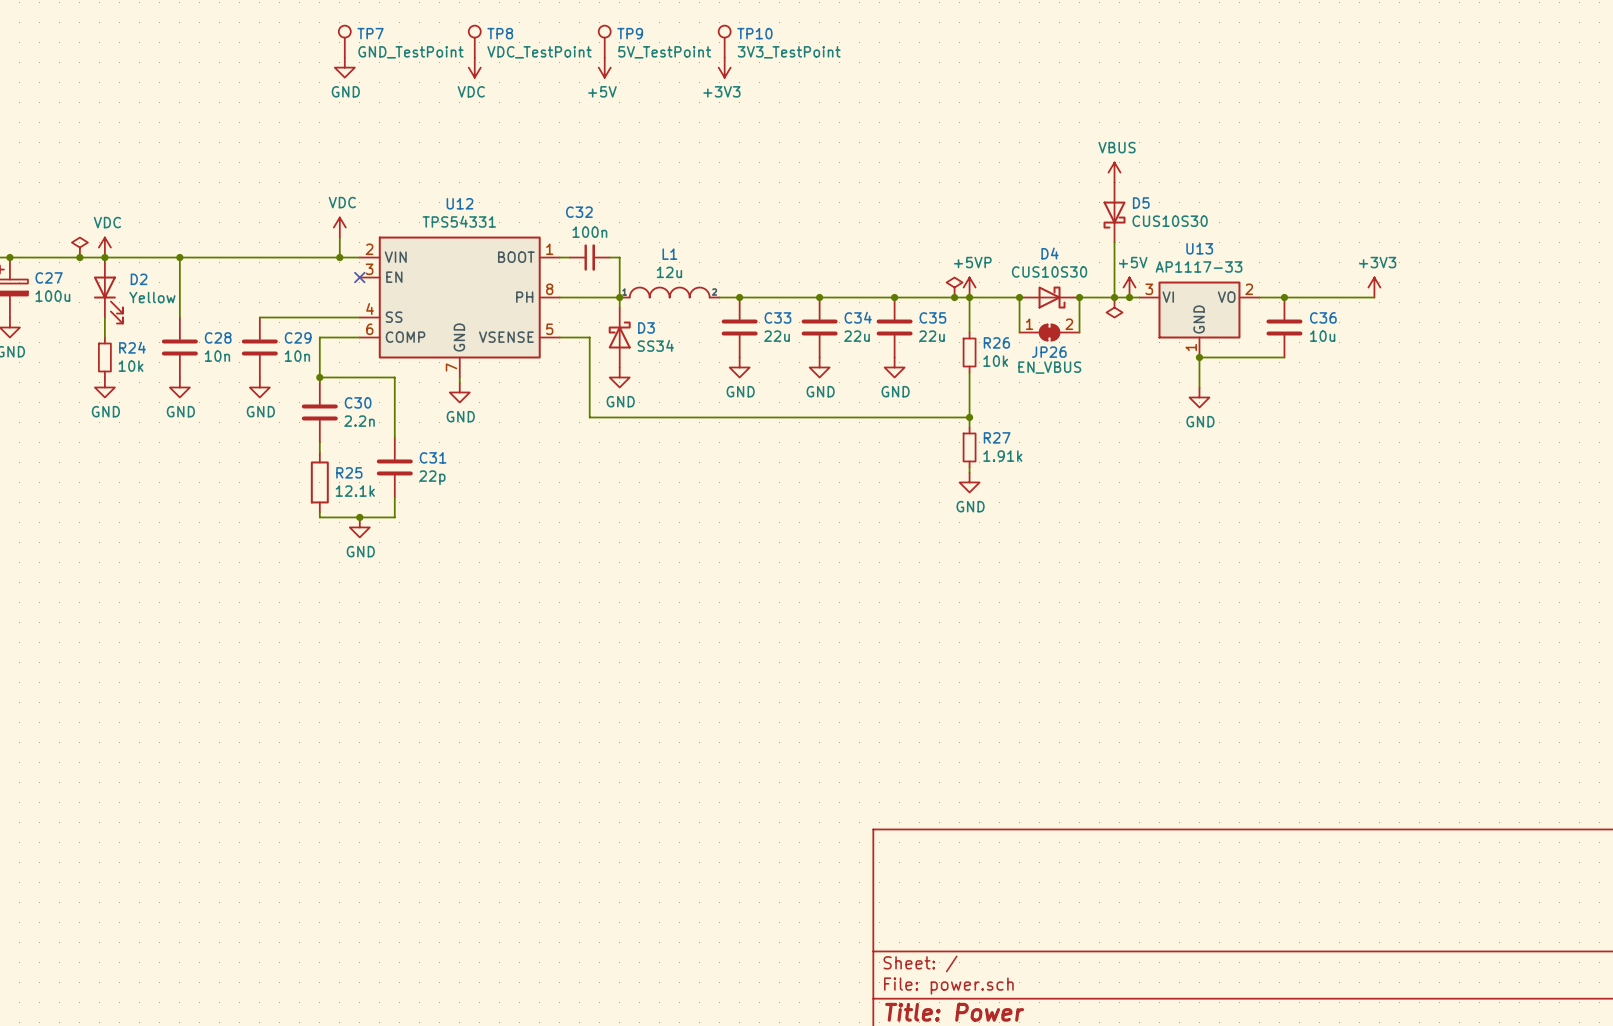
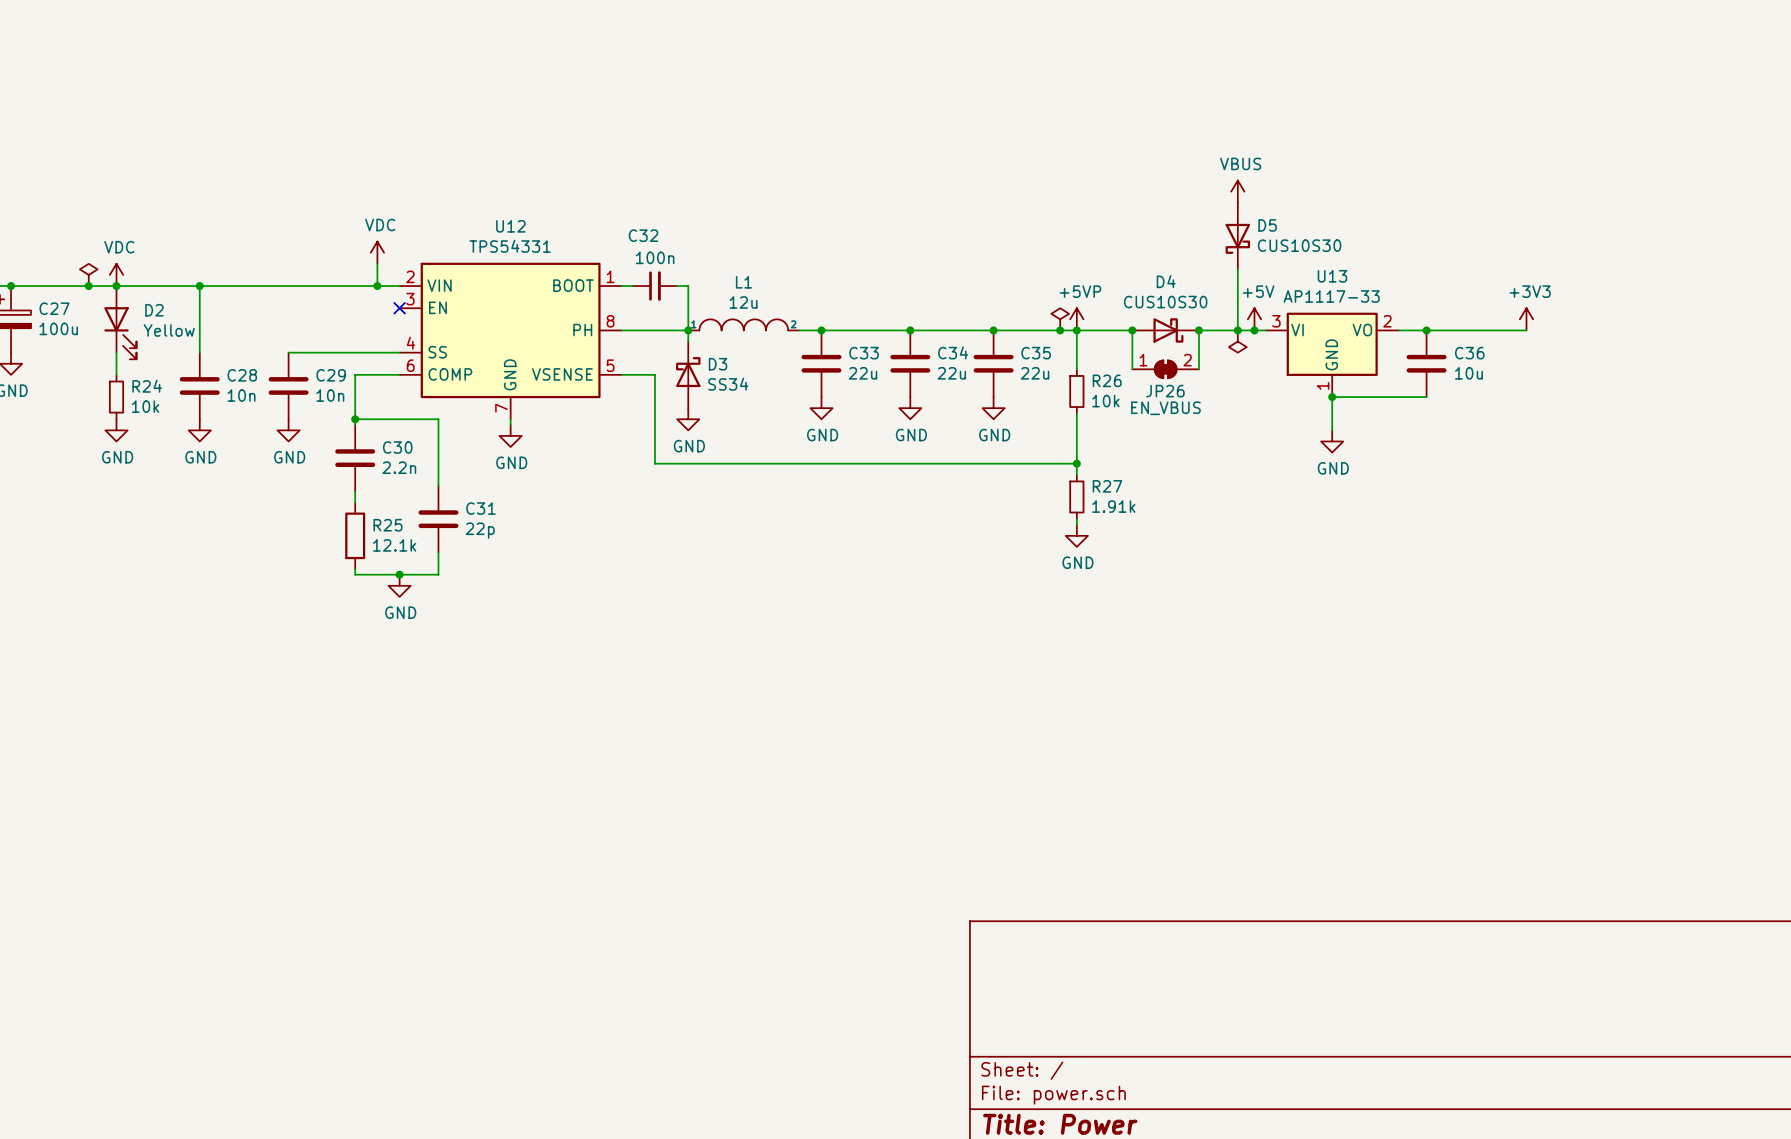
TP7: GND_TestPoint (344, 41) -> none
TP8: VDC_TestPoint (474, 41) -> none
TP9: 5V_TestPoint (604, 41) -> none
TP10: 3V3_TestPoint (724, 41) -> none
power symbol: GND (344, 67) -> none
power symbol: VDC (474, 67) -> none
power symbol: +5V (604, 67) -> none
power symbol: +3V3 (724, 67) -> none

